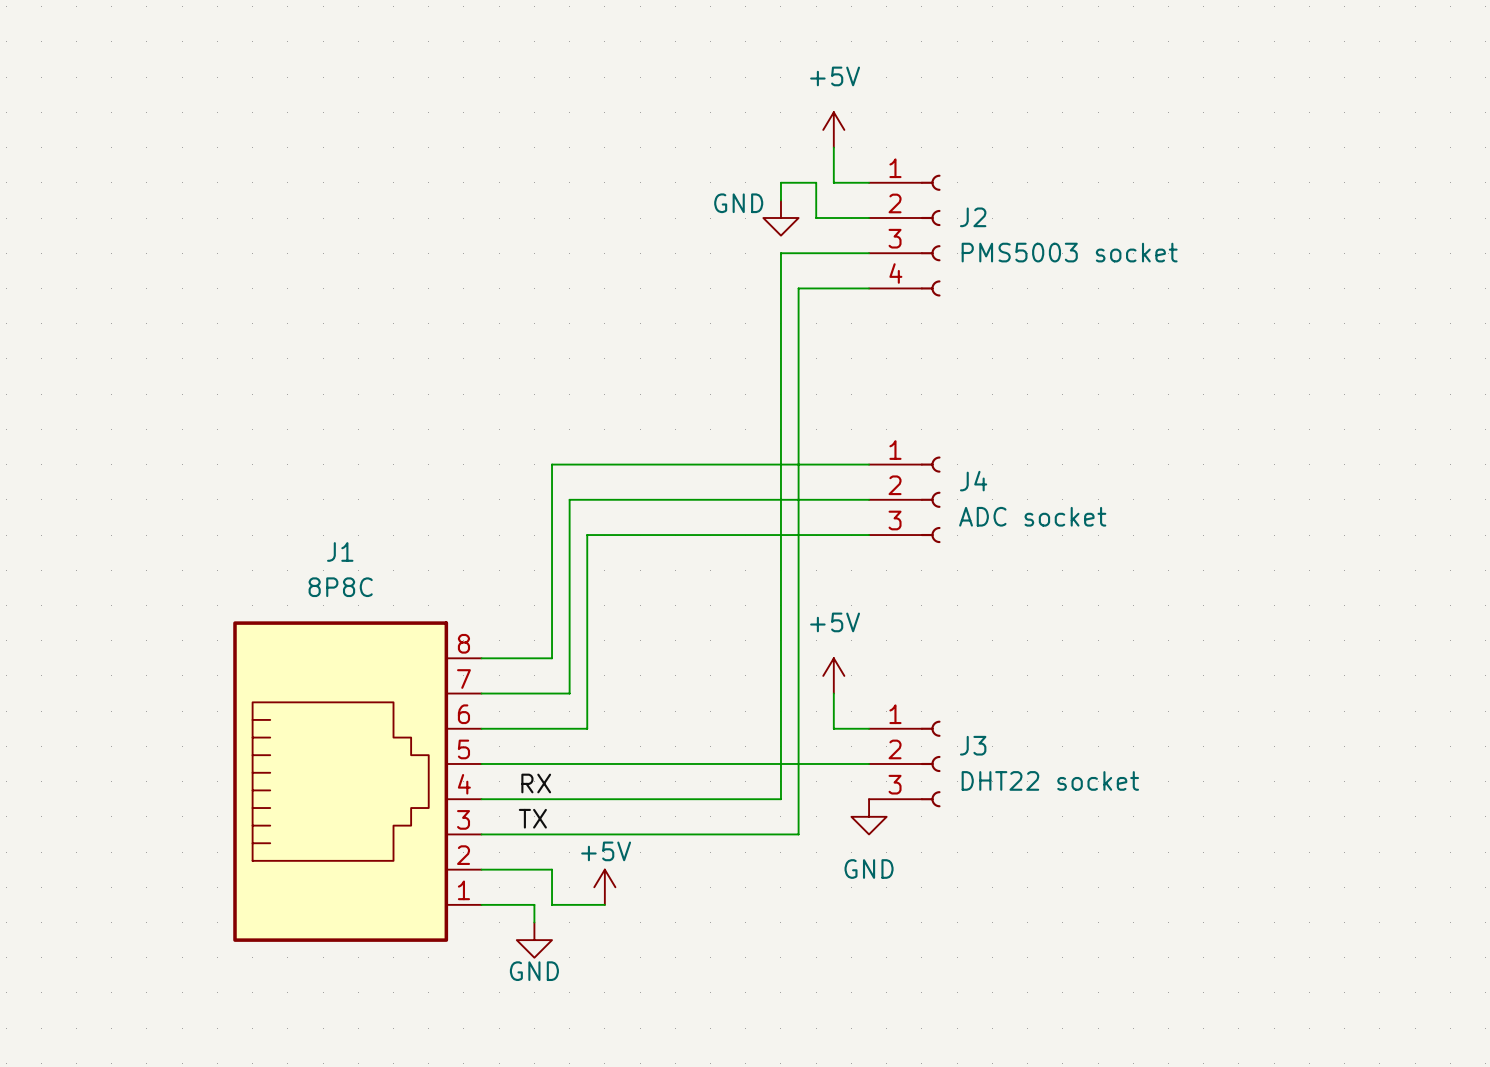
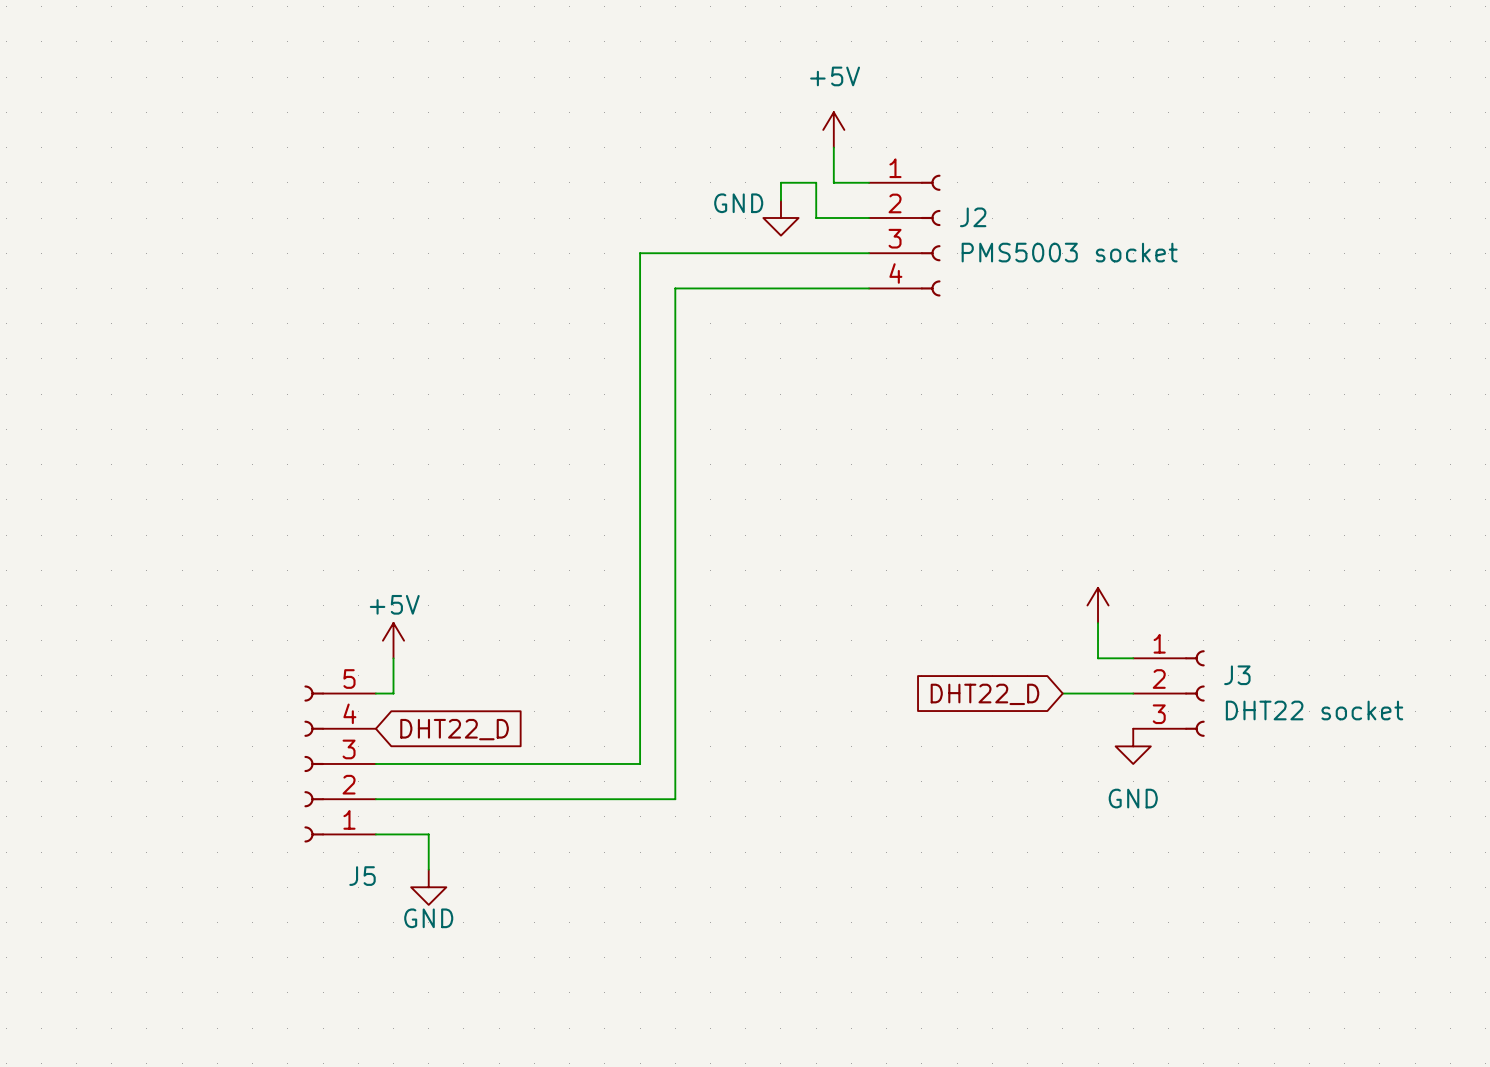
wire: (780, 253) (780, 799) (675, 799) -> (798, 288) (675, 288) (675, 799)
wire: (798, 288) (798, 834) (481, 834) -> none
wire: (869, 464) (552, 464) (552, 658) (481, 658) -> none
wire: (869, 499) (569, 499) (569, 693) (481, 693) -> none
J4: ADC socket (904, 499) -> none
wire: (869, 535) (587, 535) (587, 728) (481, 728) -> none
power symbol: none -> (1098, 605)
power symbol: none -> +5V (393, 640)
power symbol: +5V (833, 675) -> none
wire: (833, 693) (833, 728) (869, 728) -> (1098, 623) (1098, 658) (1133, 658)
wire: none -> (1062, 693) (1133, 693)
global label: none -> DHT22_D (984, 694)
global label: none -> DHT22_D (454, 729)
power symbol: none -> GND (1133, 746)
J5: none -> (340, 763)
wire: (640, 763) (869, 763) -> (640, 763) (640, 253) (780, 253)
J3 position: (904, 763) -> (1168, 693)
J1: 8P8C (357, 781) -> none
label: RX (536, 783) -> none
power symbol: GND (869, 816) -> none
label: TX (532, 818) -> none
wire: (481, 869) (552, 869) (552, 904) (604, 904) -> none
power symbol: +5V (604, 887) -> none
wire: (481, 904) (534, 904) (534, 922) -> none
power symbol position: GND (534, 940) -> GND (428, 887)

